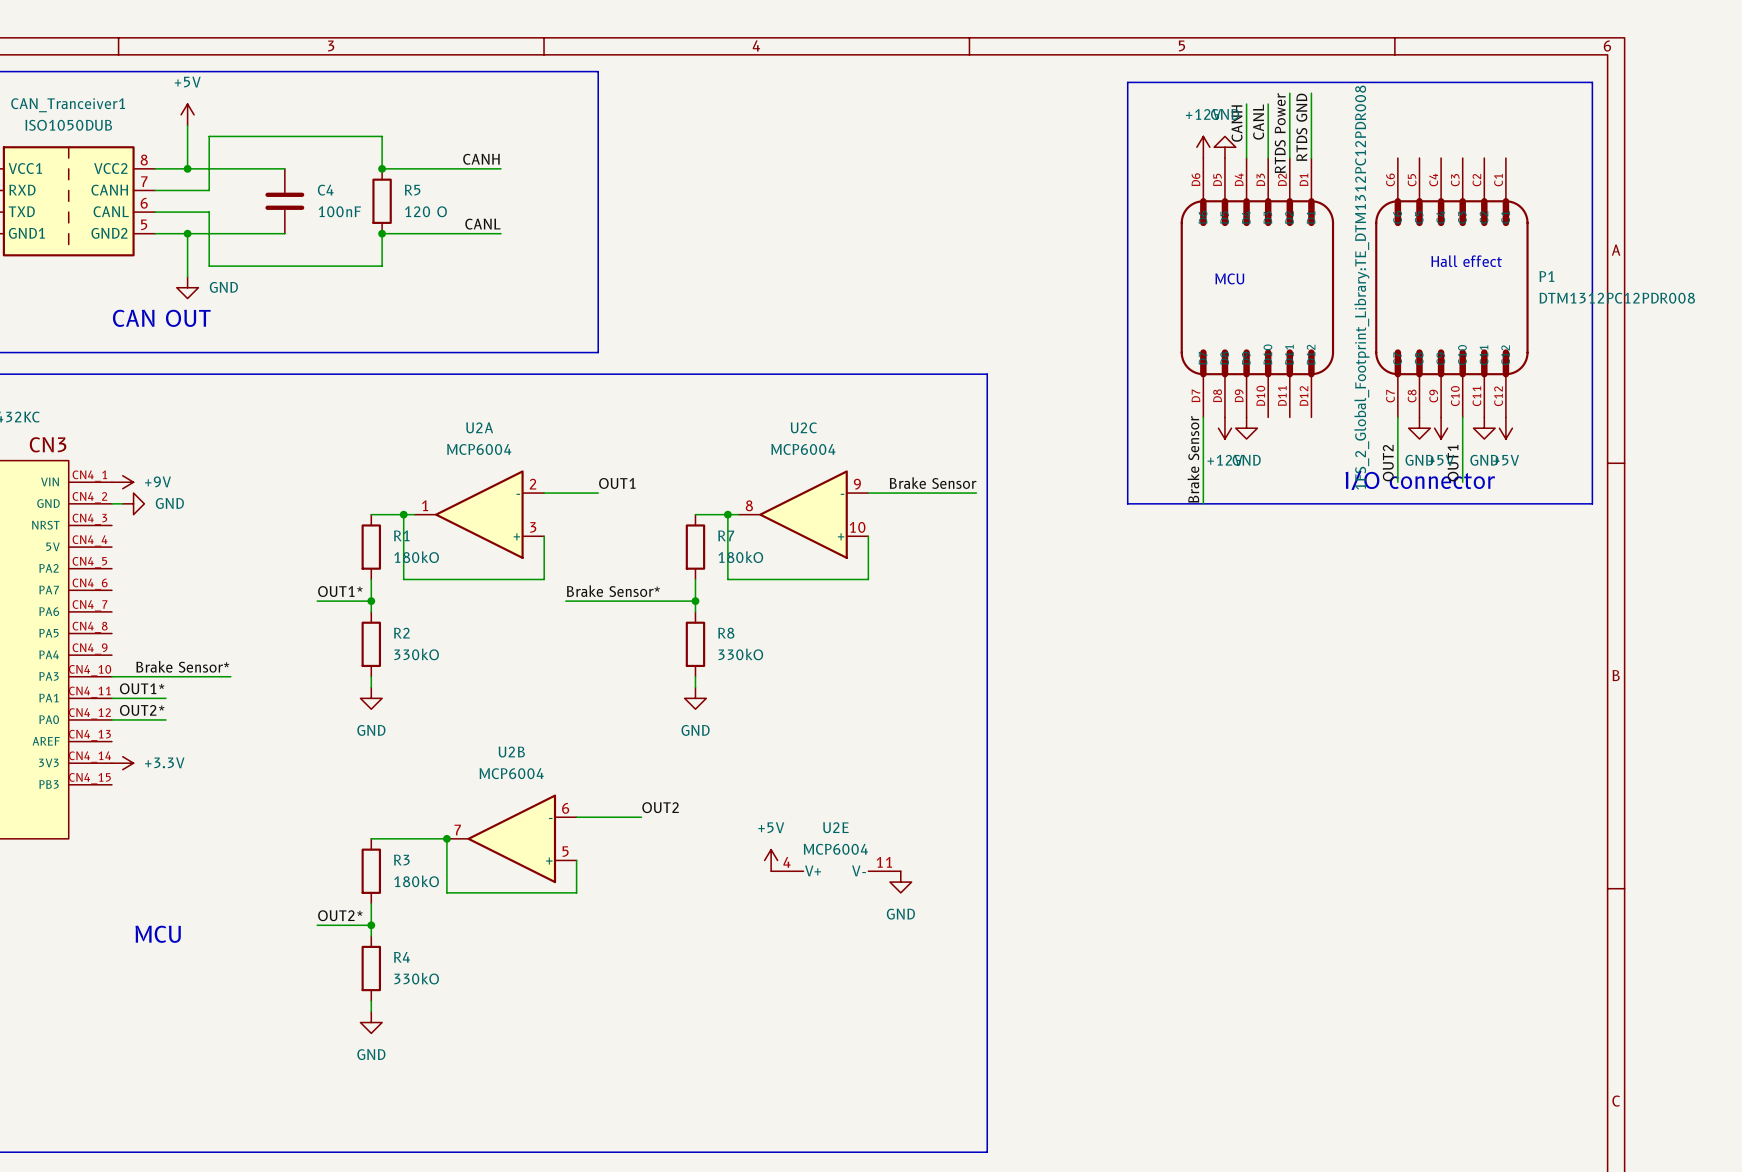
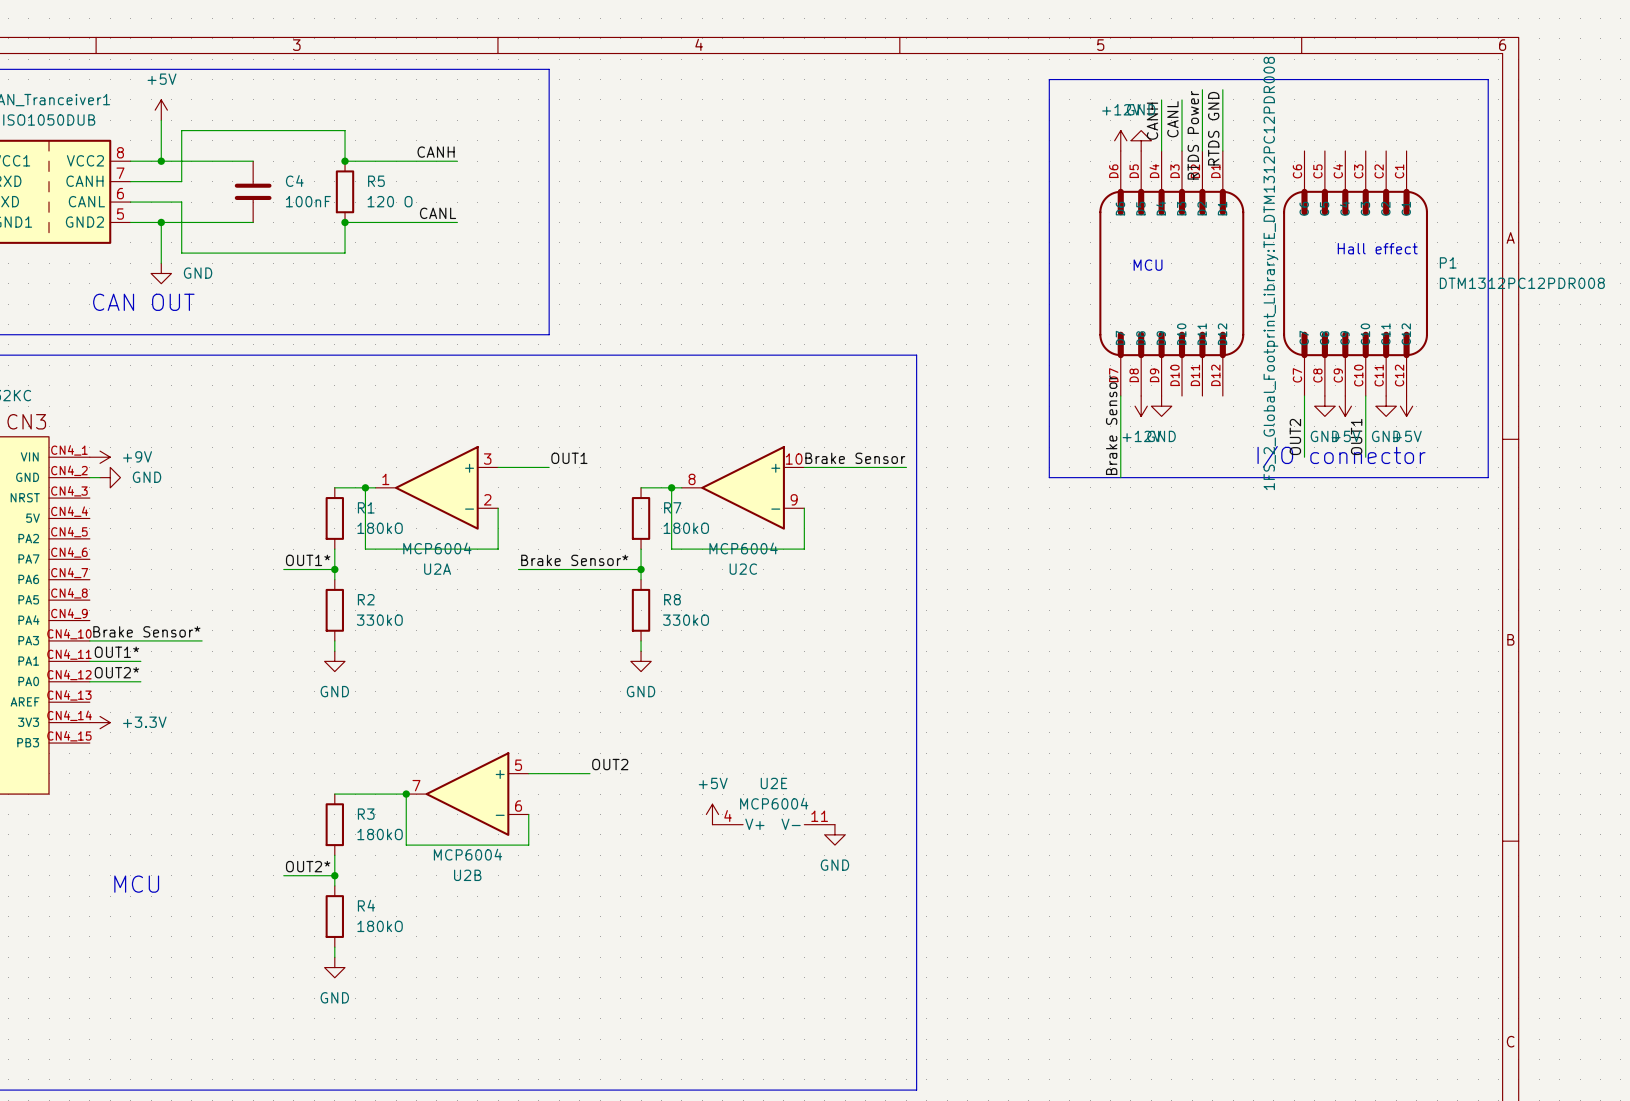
U2A flip: as is (479, 514) -> up-down (436, 487)
U2C flip: as is (803, 514) -> up-down (743, 487)
U2B flip: as is (511, 838) -> up-down (467, 794)
R4 value: 330kO (416, 978) -> 180kO (380, 926)

